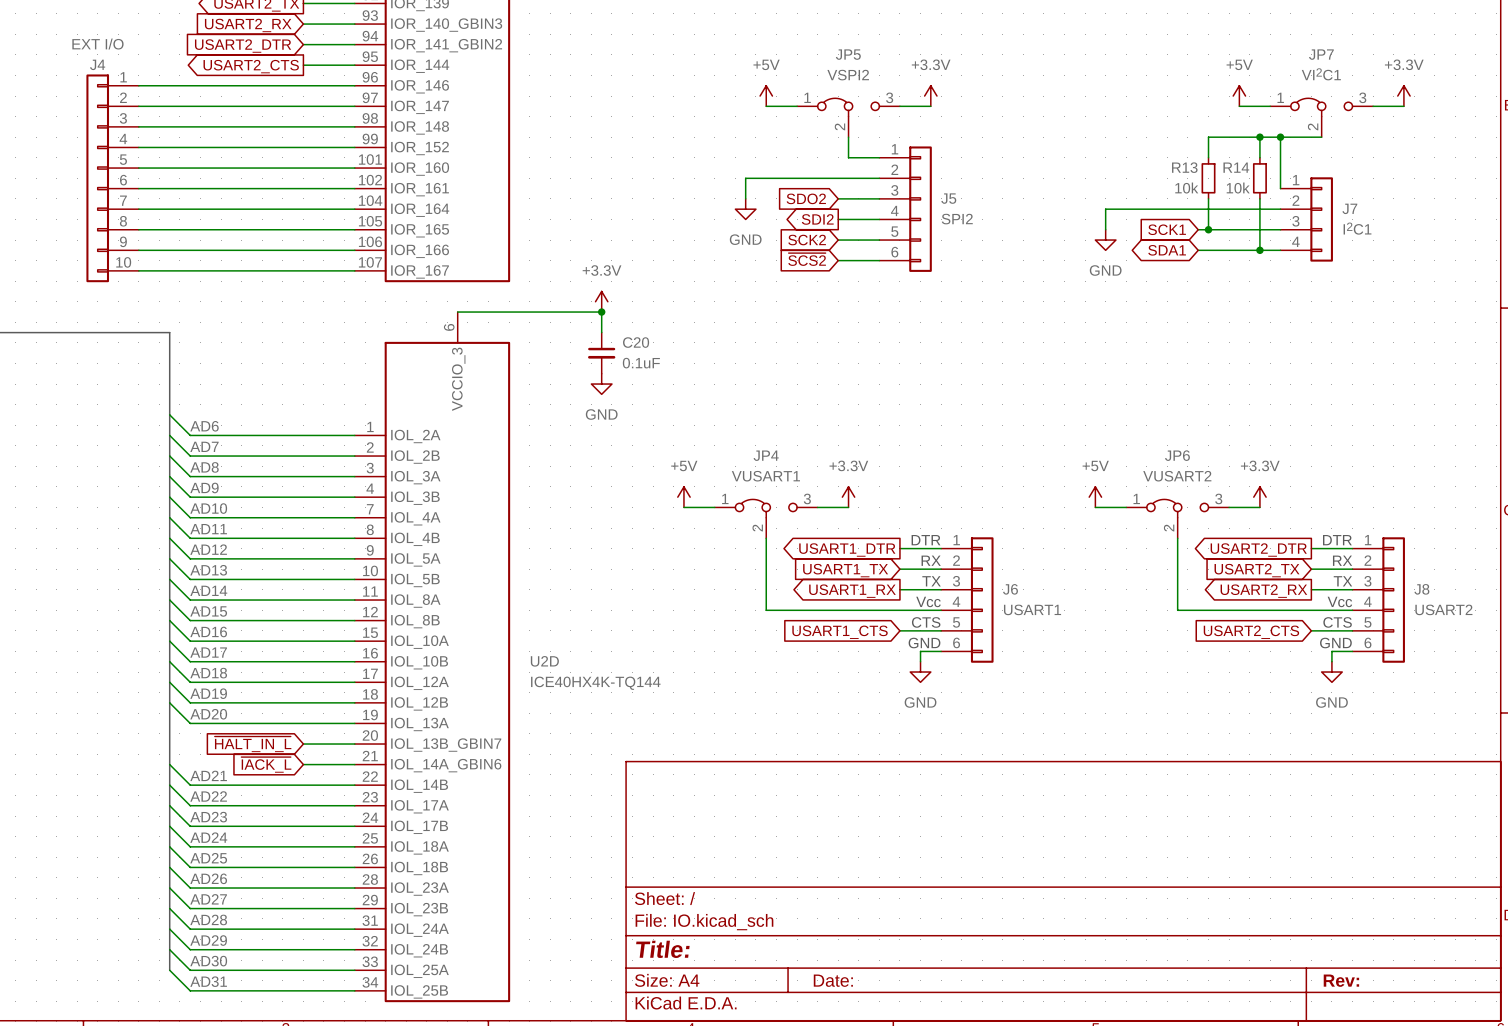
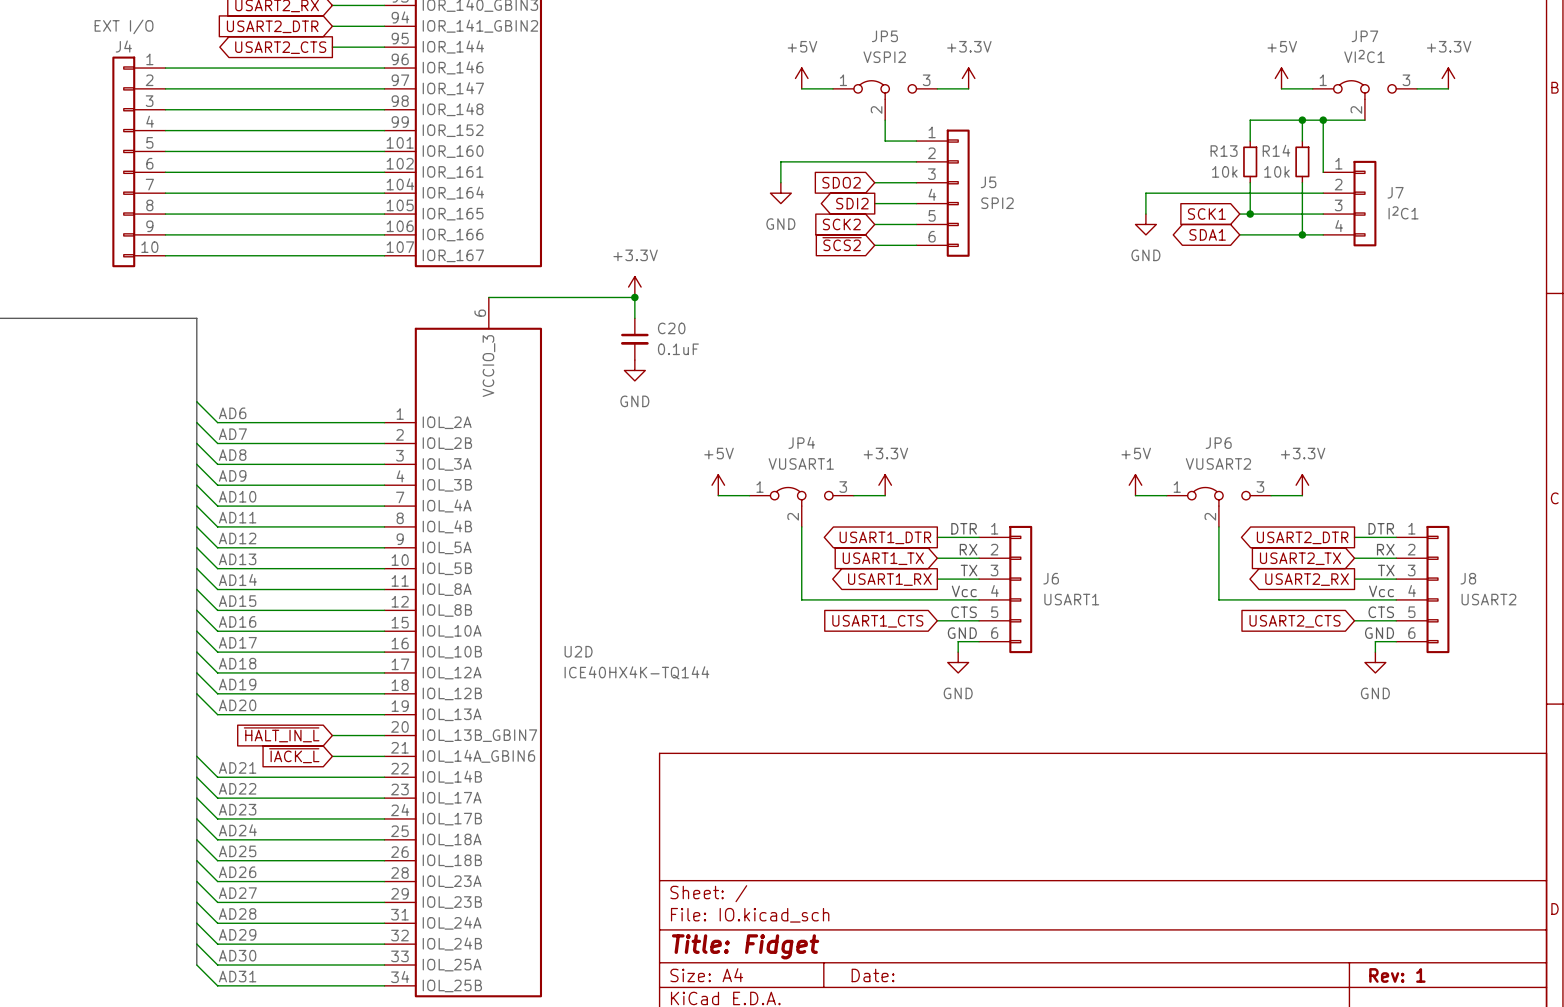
title block: Title: (662, 949) -> Title: Fidget (745, 946)
title block: Rev: (1341, 980) -> Rev: 1 (1397, 975)

